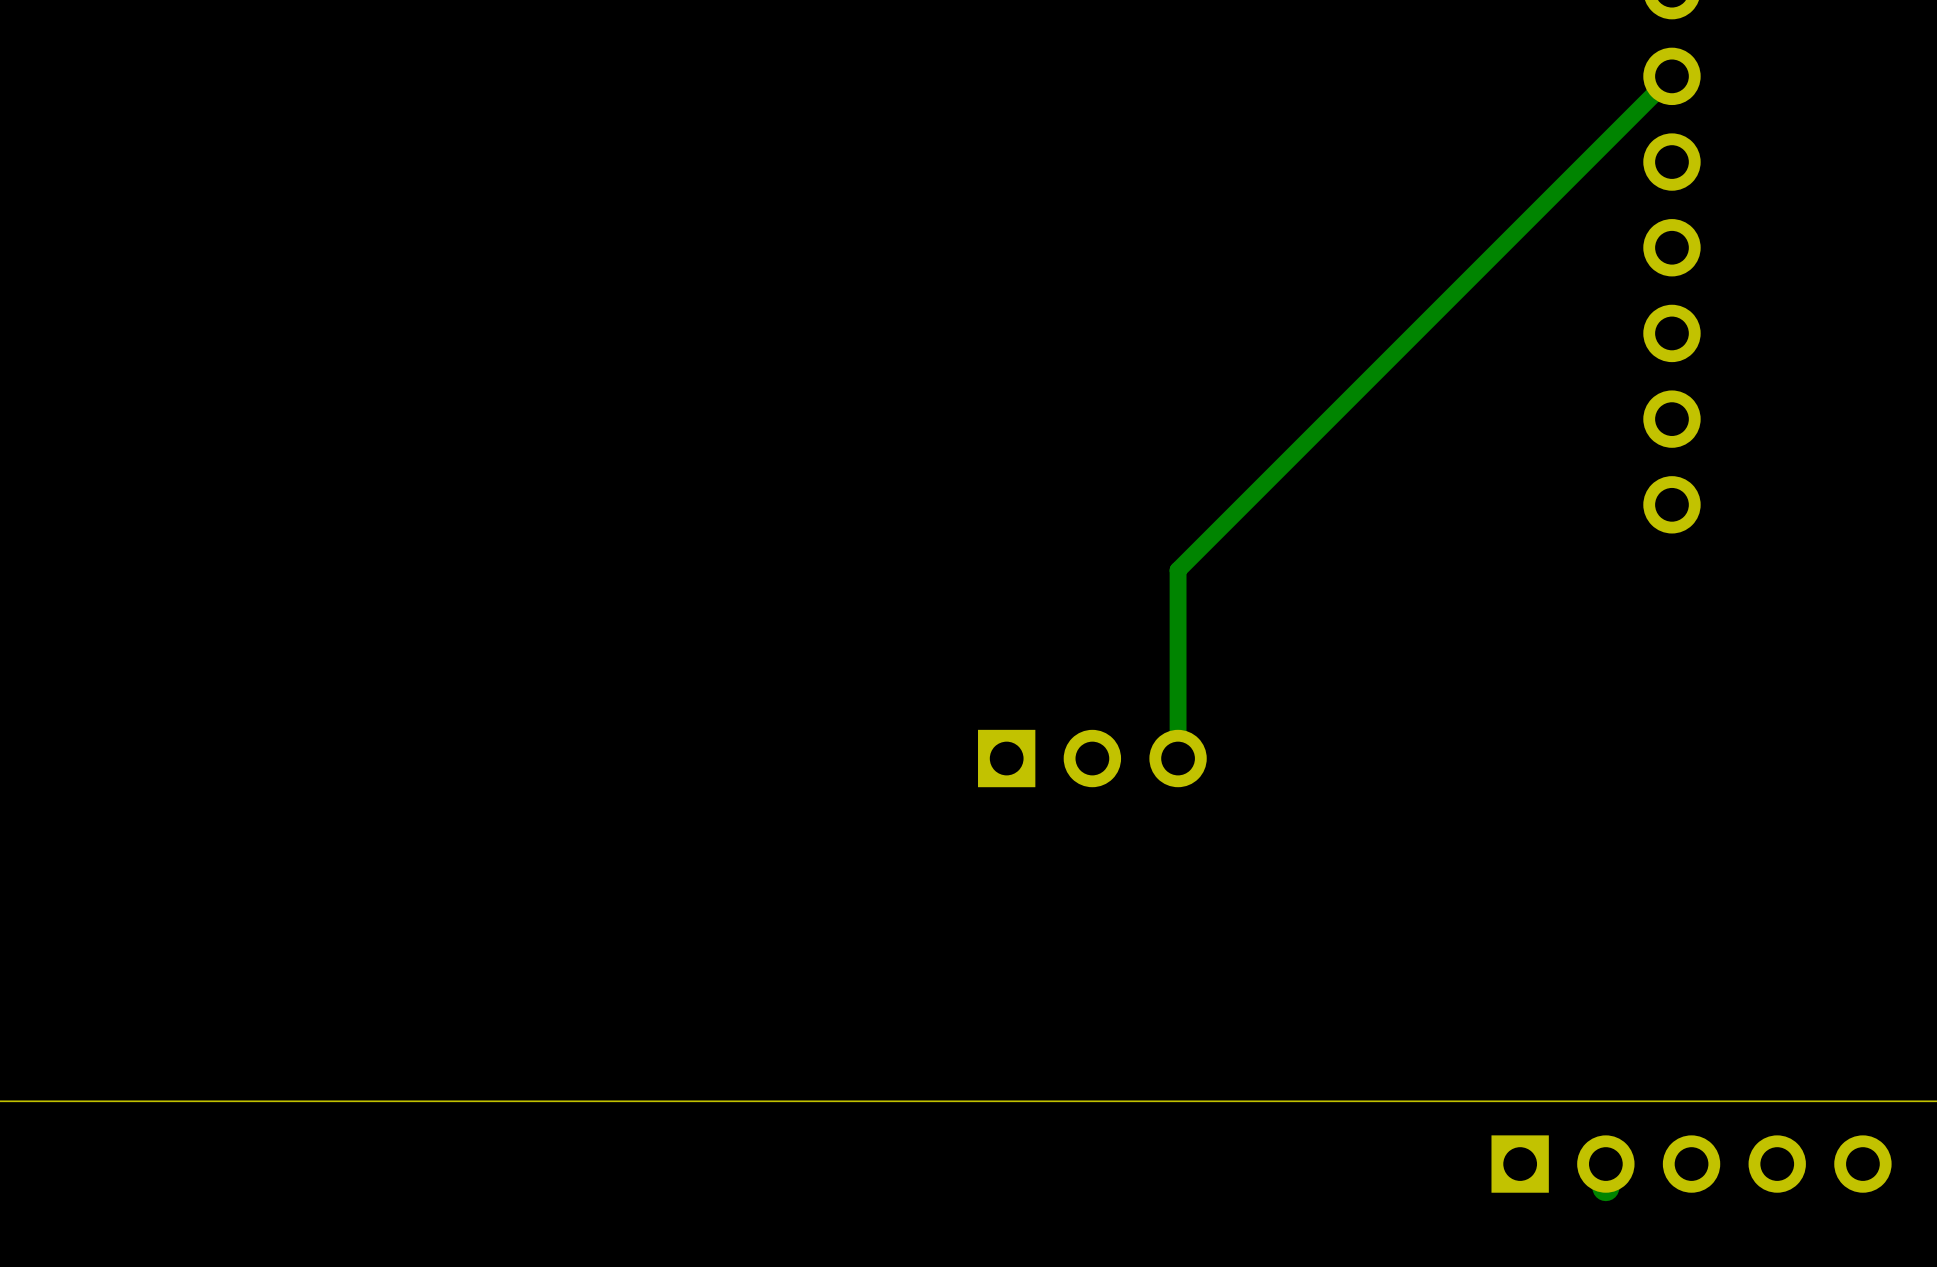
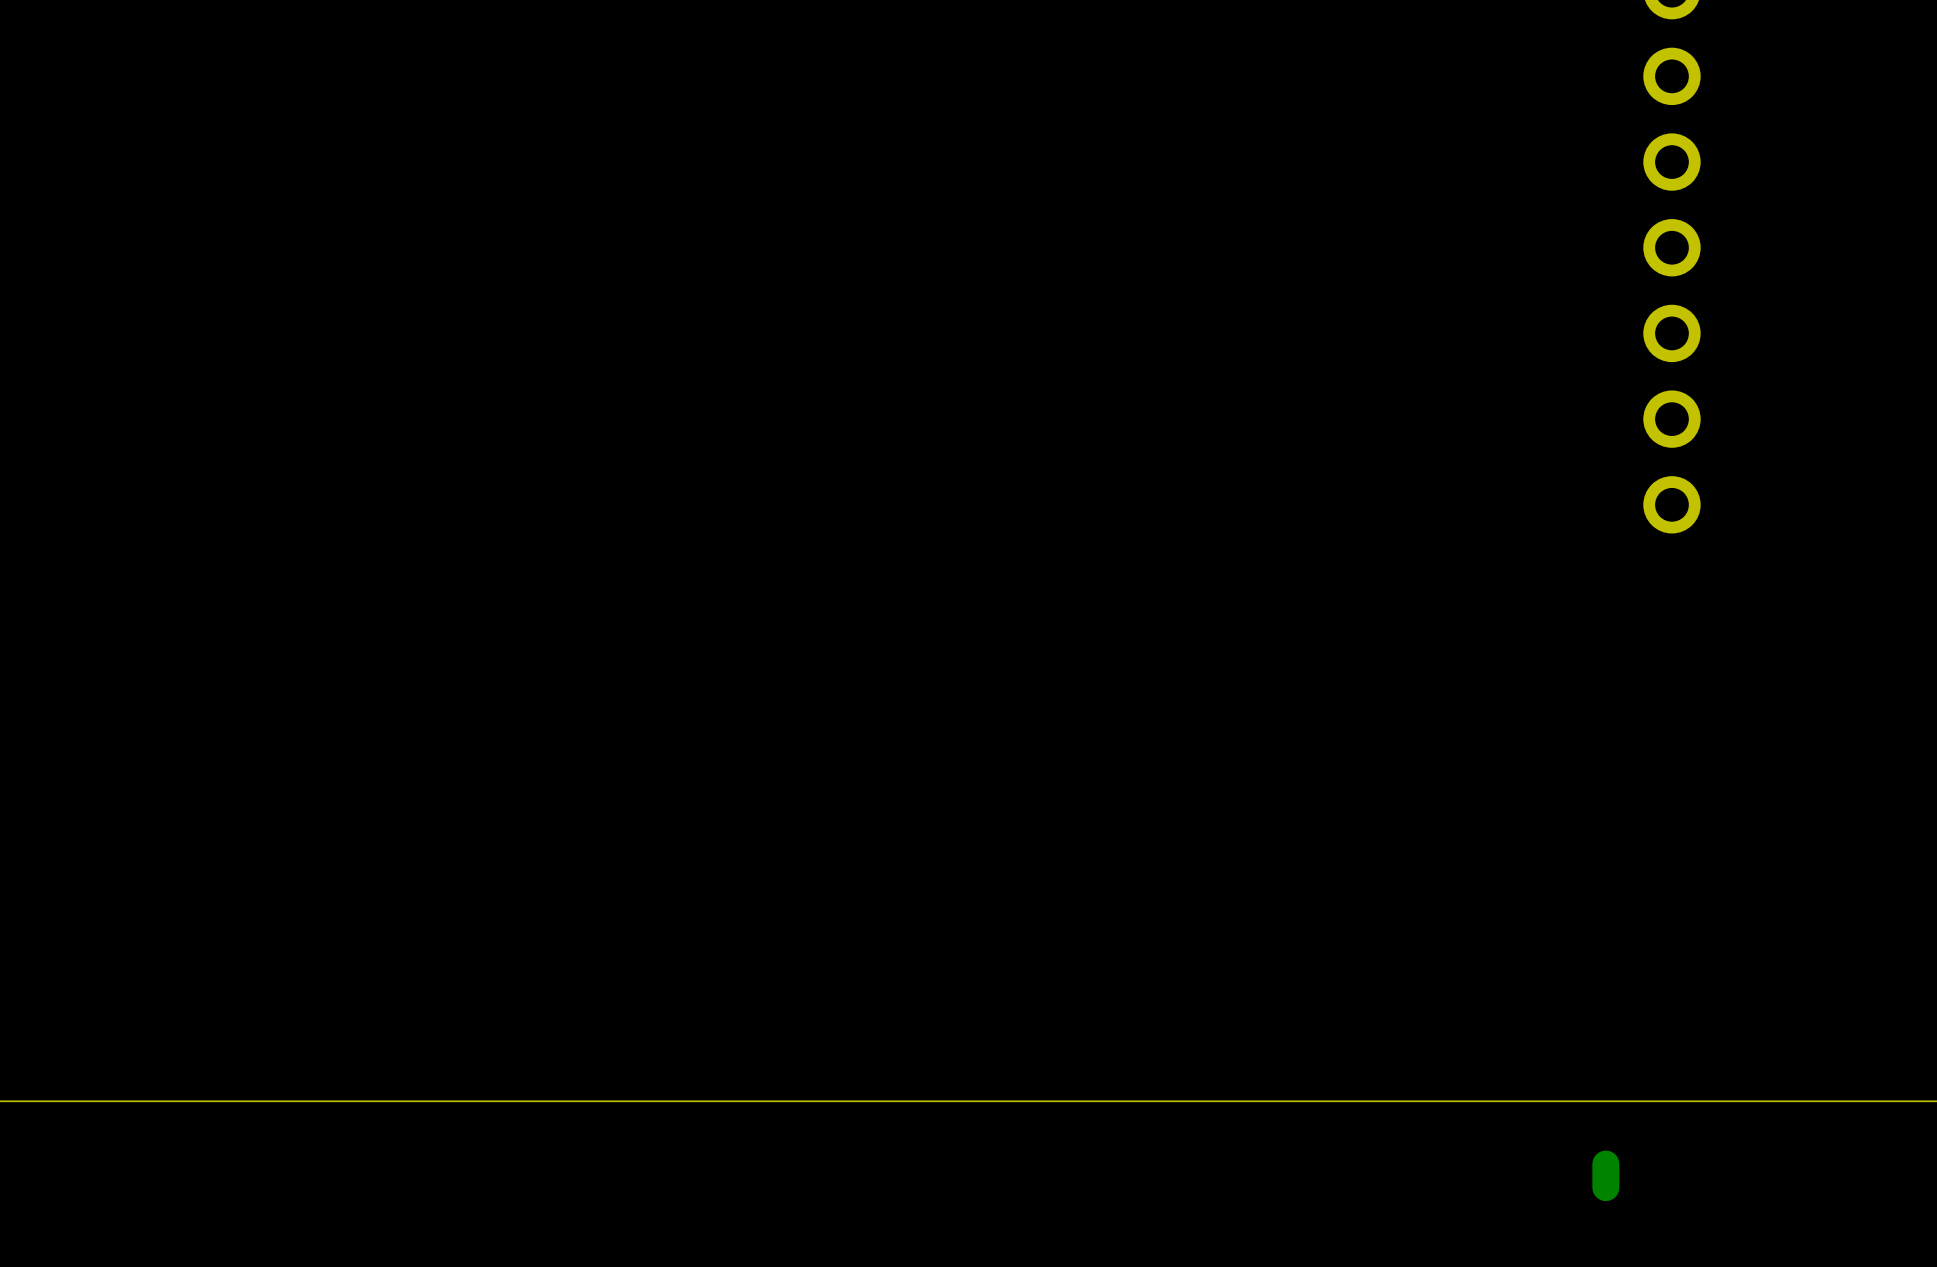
bottom track: (1671, 76) (1178, 570) (1178, 758) -> none
part: (1092, 758) -> none
part: (1691, 1164) -> none

